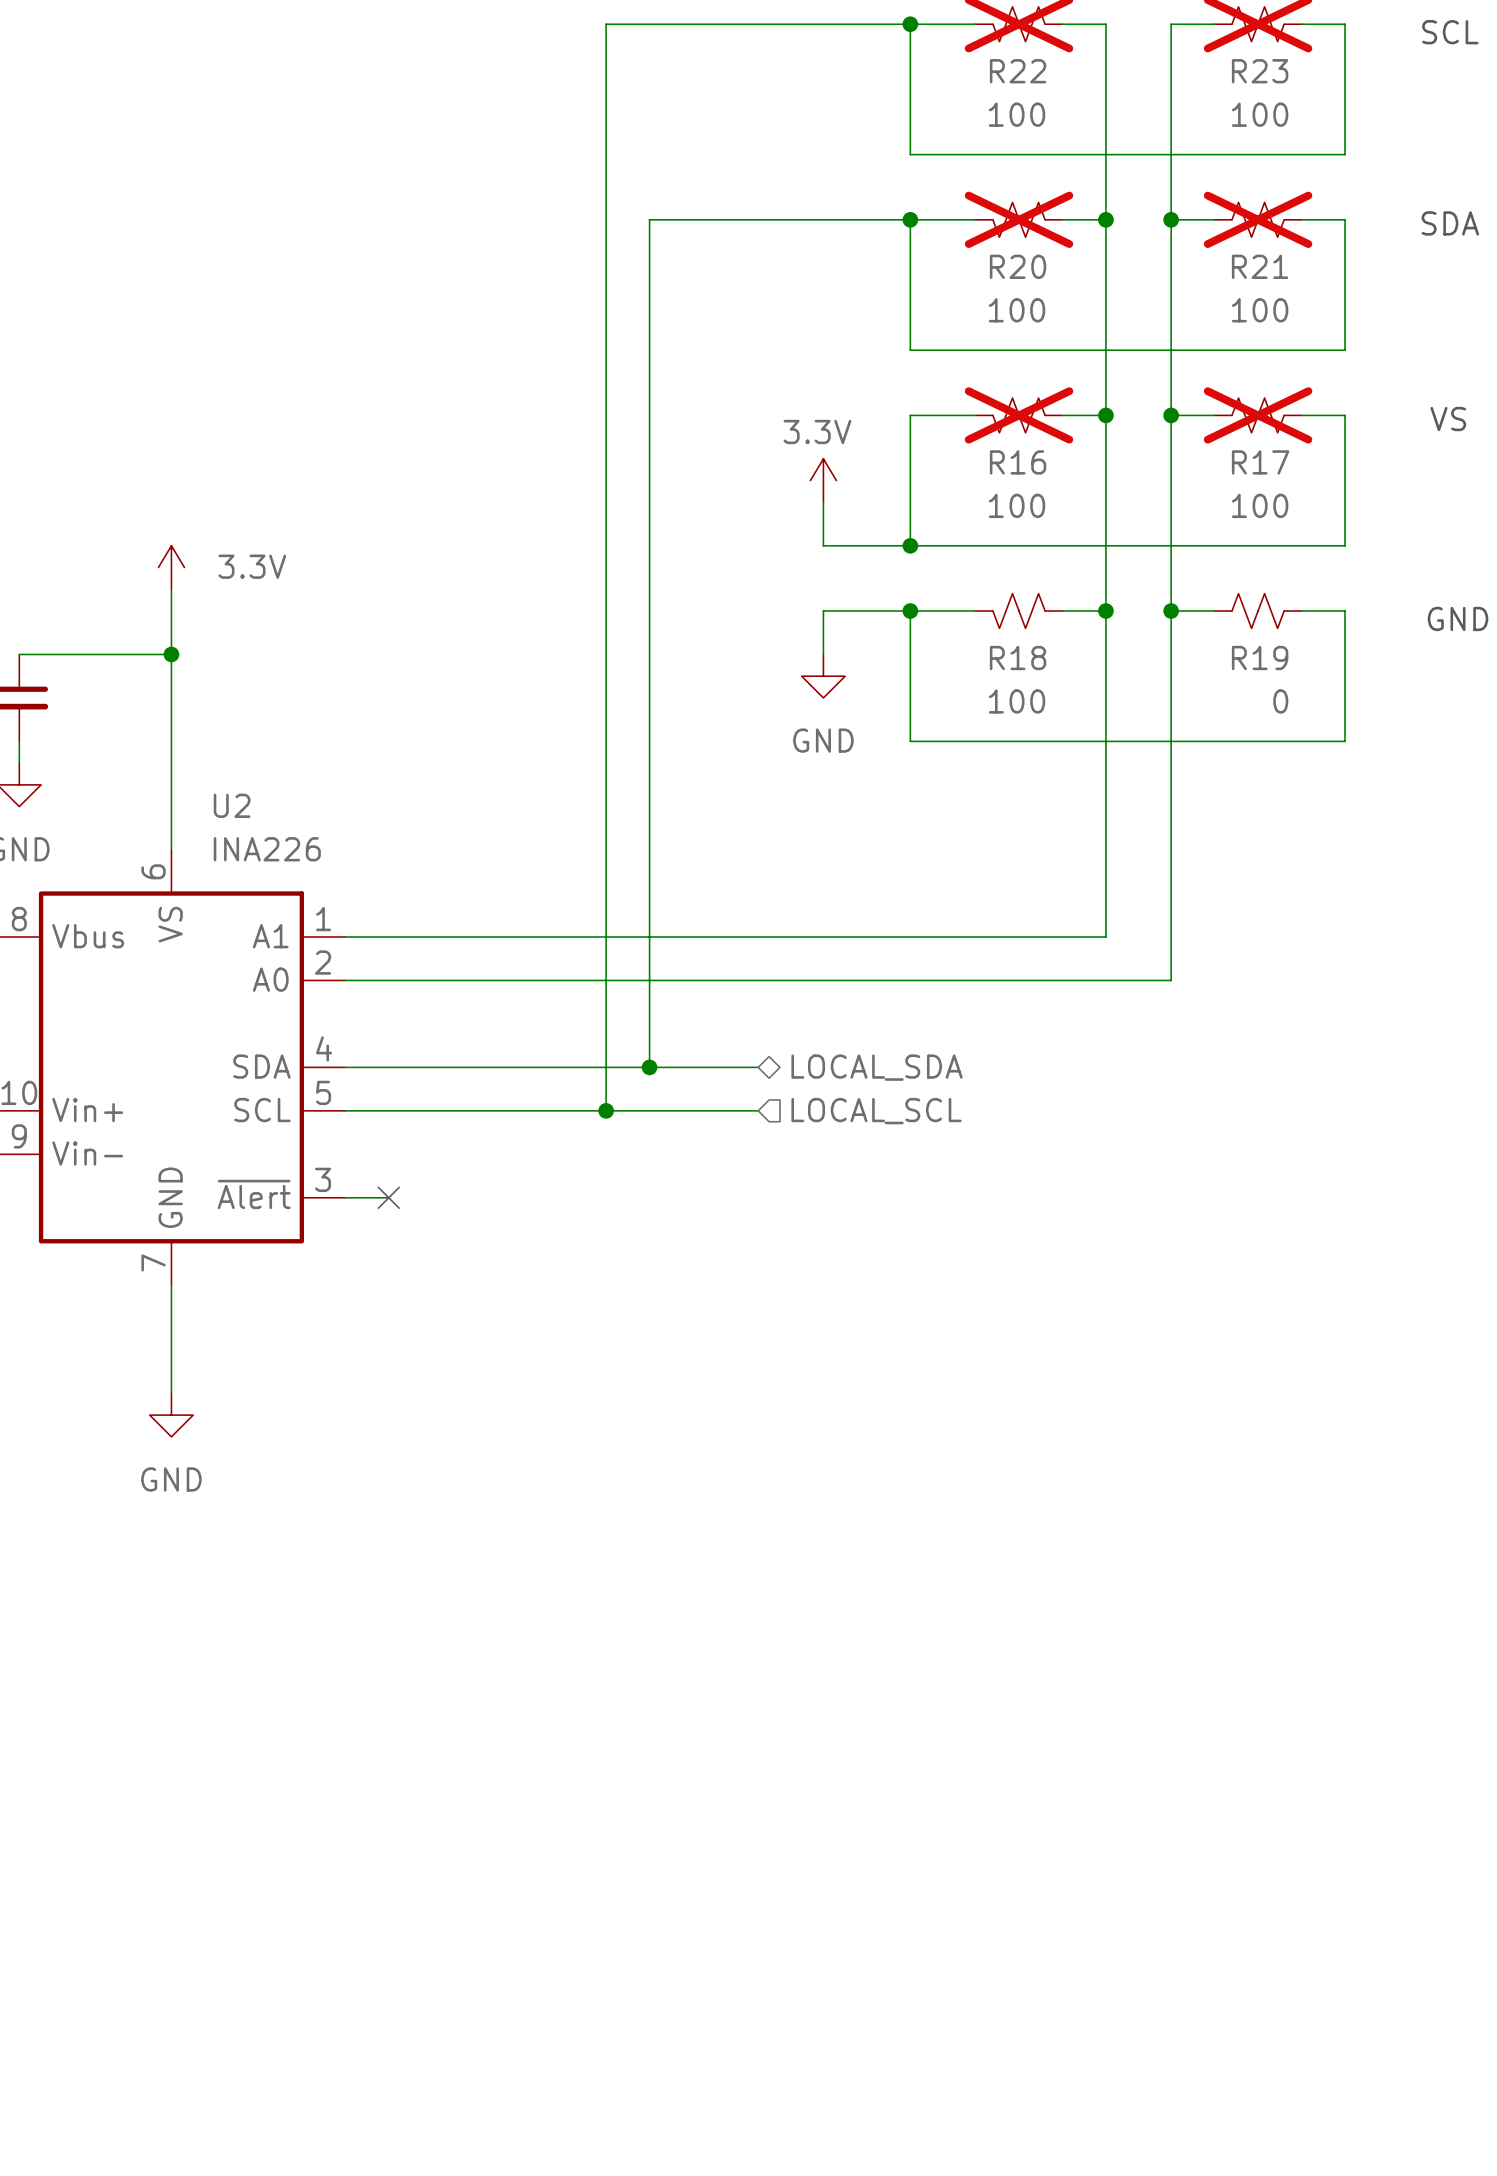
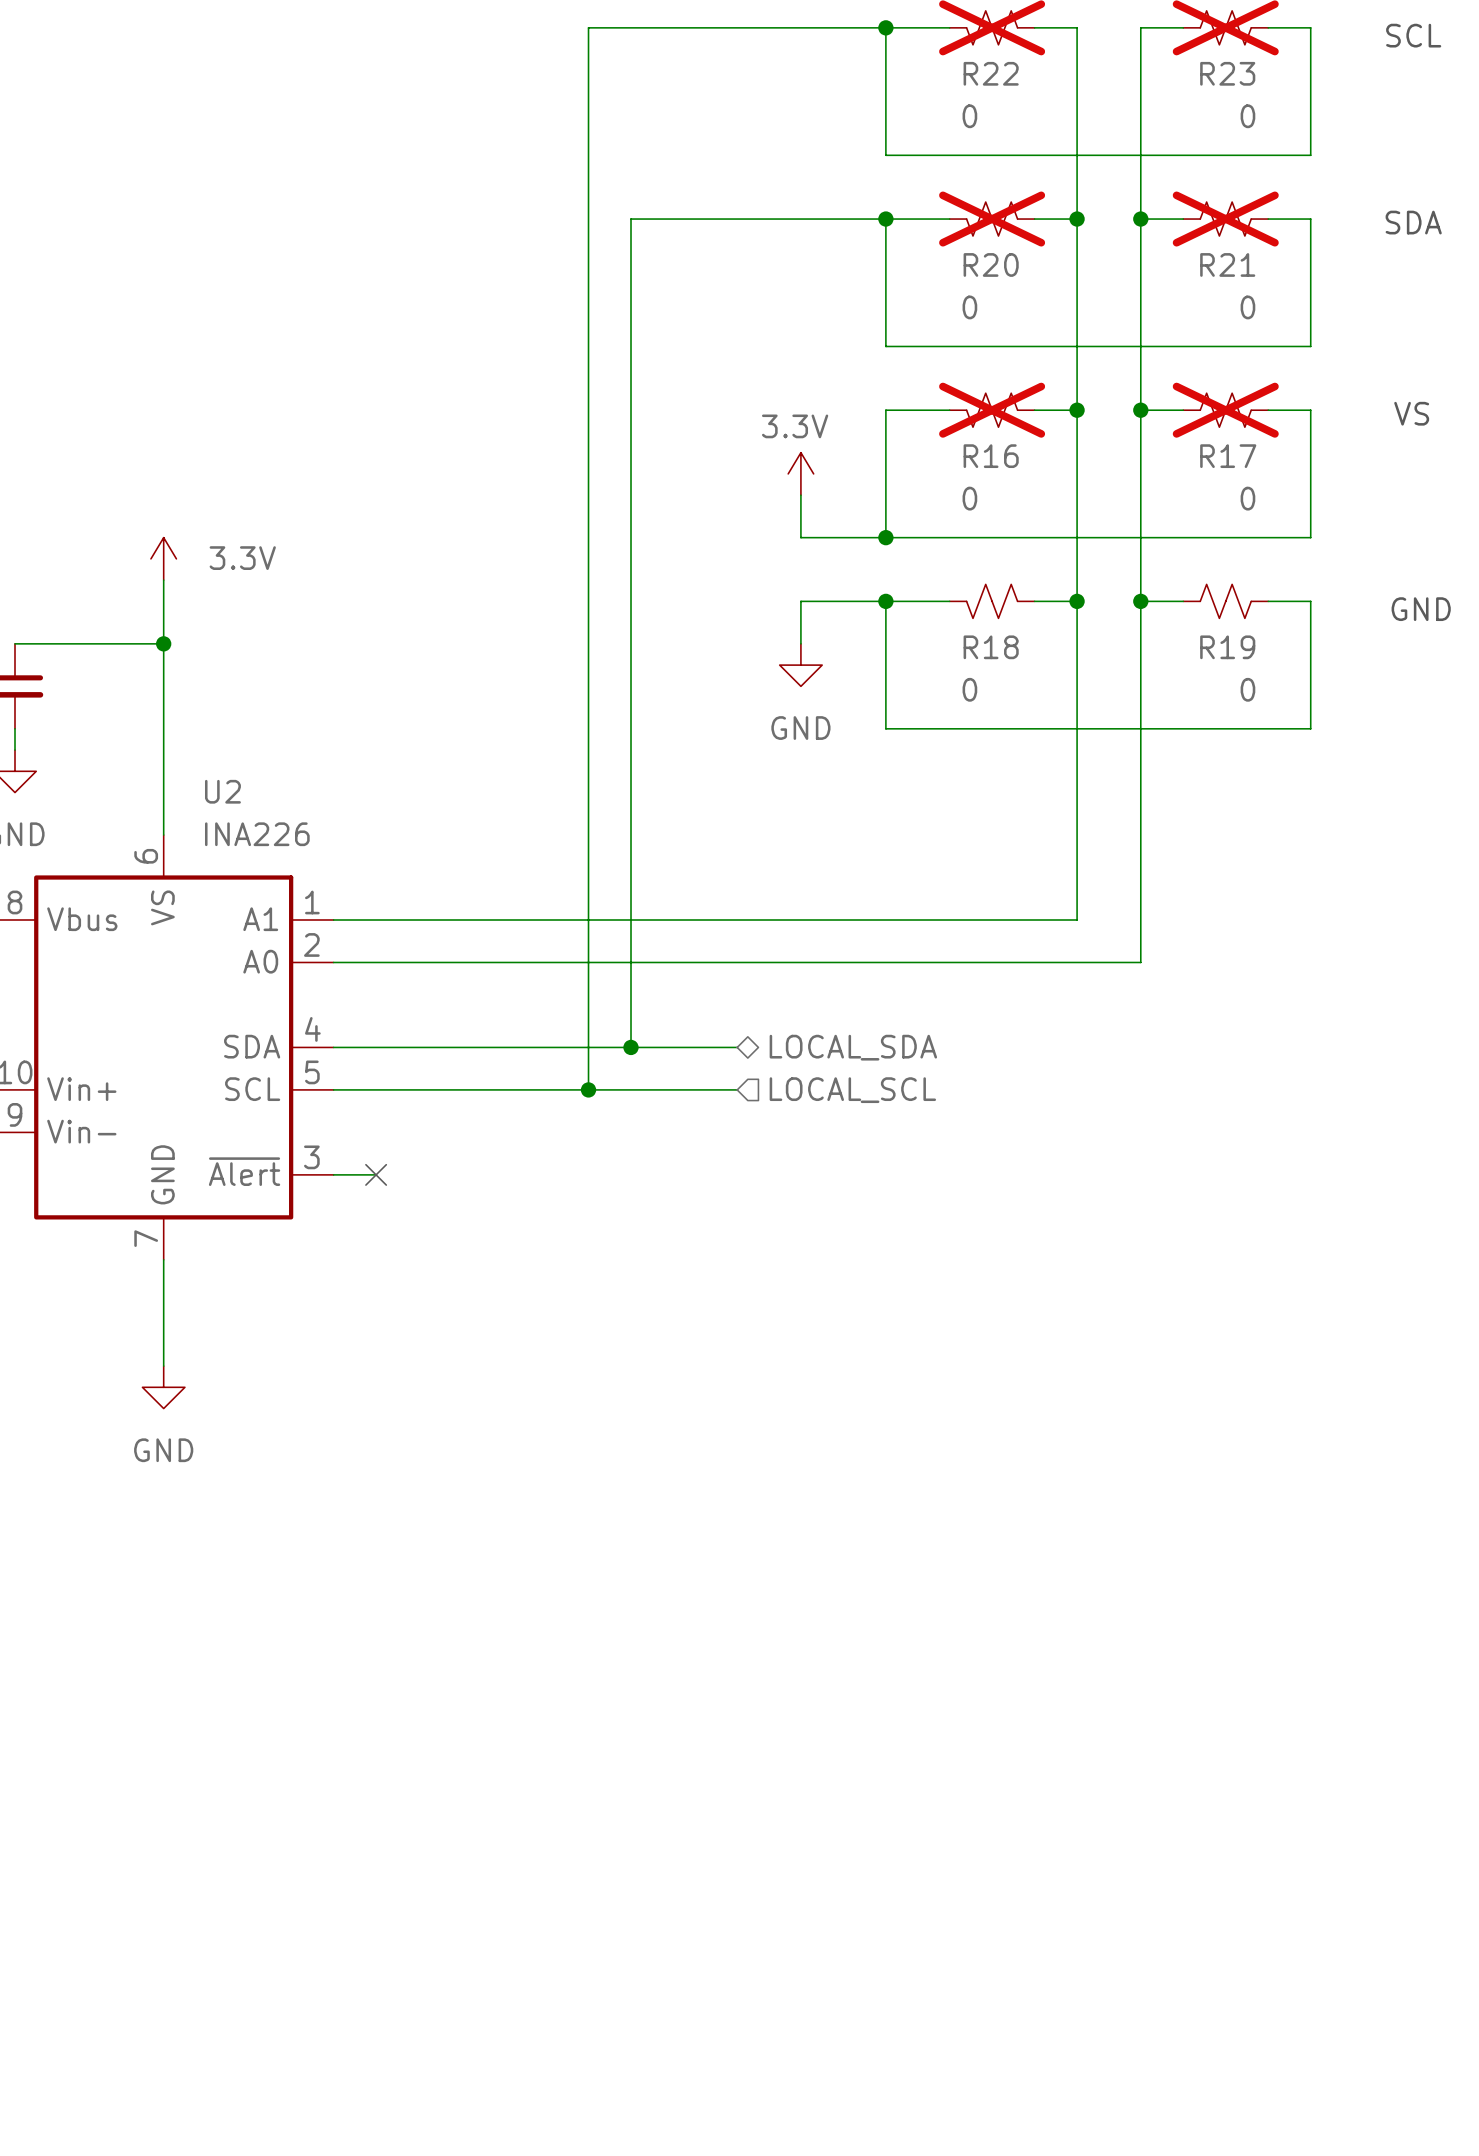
R22 value: 100 (1017, 114) -> 0 (969, 116)
R23 value: 100 (1260, 114) -> 0 (1247, 116)
R20 value: 100 (1017, 310) -> 0 (969, 307)
R21 value: 100 (1260, 310) -> 0 (1247, 307)
R16 value: 100 (1017, 505) -> 0 (969, 498)
R17 value: 100 (1260, 505) -> 0 (1247, 498)
R18 value: 100 (1017, 701) -> 0 (969, 689)

